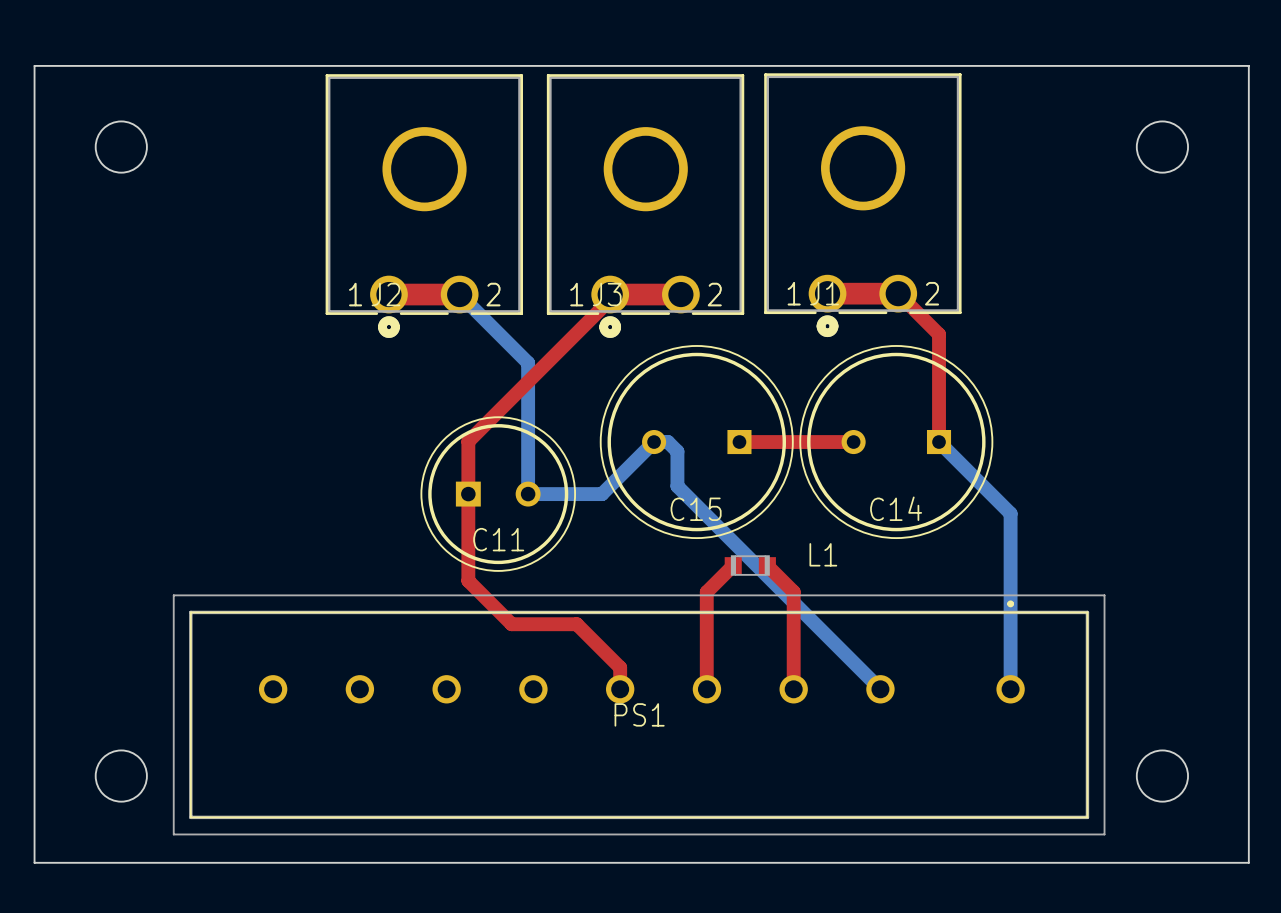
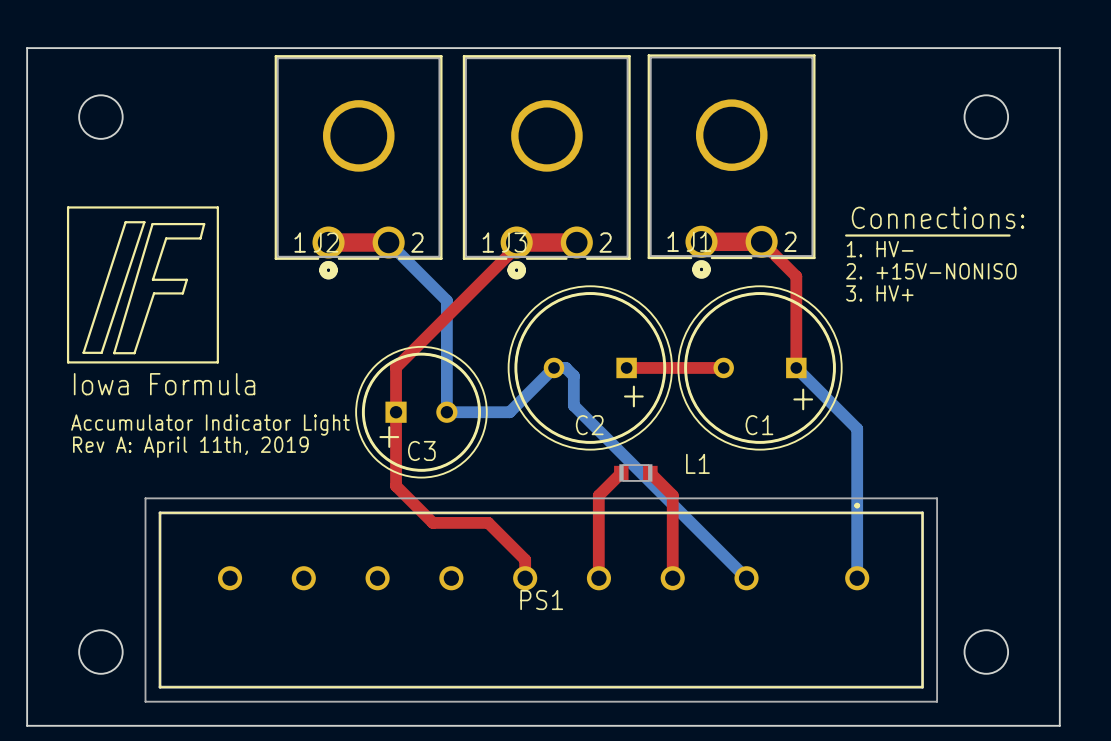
line: none -> (68, 207) (68, 362) (217, 362) (217, 207) (68, 207)
text: none -> Connections: (938, 217)
line: none -> (125, 222) (83, 352) (101, 352) (144, 222) (125, 222)
line: none -> (152, 224) (114, 353) (134, 353) (154, 293) (182, 293) (186, 279) (152, 279) (166, 238) (200, 238) (204, 224) (152, 224)
line: none -> (846, 235) (1009, 235)
text: none -> 1. HV- (880, 249)
text: none -> 2. +15V-NONISO (931, 271)
text: none -> 3. HV+ (879, 293)
text: none -> Iowa Formula (164, 384)
text: none -> + (633, 396)
text: none -> + (803, 399)
C14 name: C14 (896, 508) -> C1 (759, 425)
text: none -> Accumulator Indicator Light (210, 425)
C15 name: C15 (696, 509) -> C2 (589, 425)
text: none -> + (389, 437)
text: none -> Rev A: April 11th, 2019 (190, 447)
C11 name: C11 (498, 539) -> C3 (421, 450)

